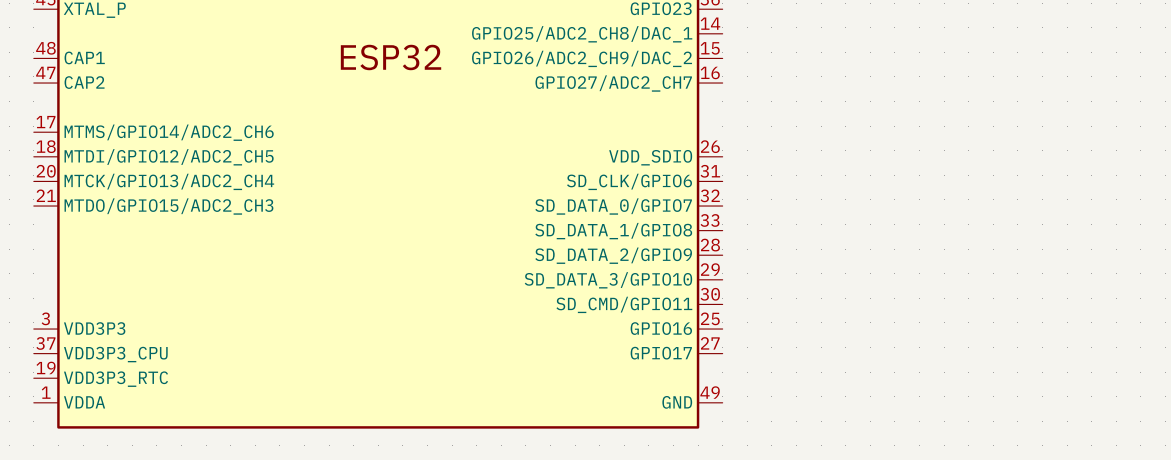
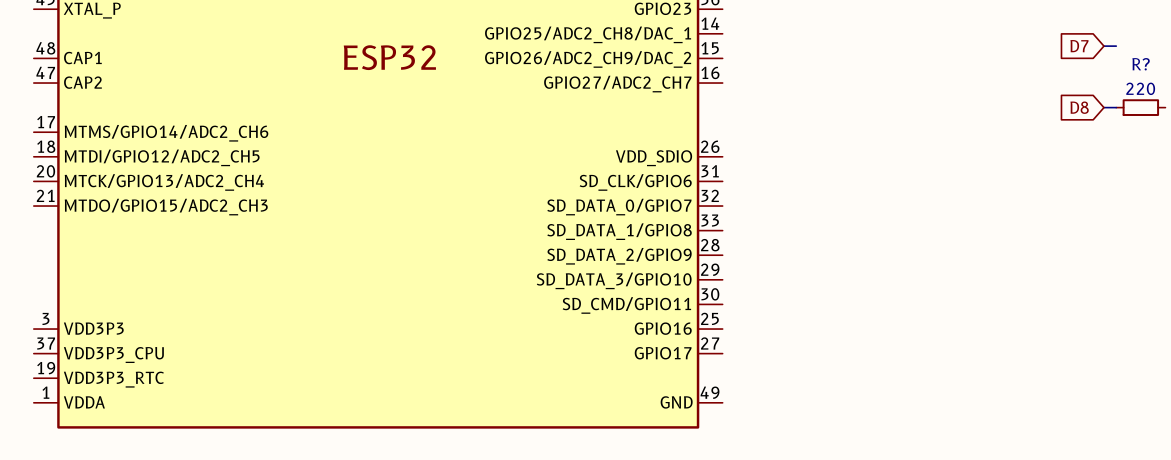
global label: none -> D7 (1079, 46)
wire: none -> (1103, 46) (1116, 46)
global label: none -> D8 (1079, 107)
wire: none -> (1103, 107) (1116, 107)
R?: none -> 220 (1140, 107)

